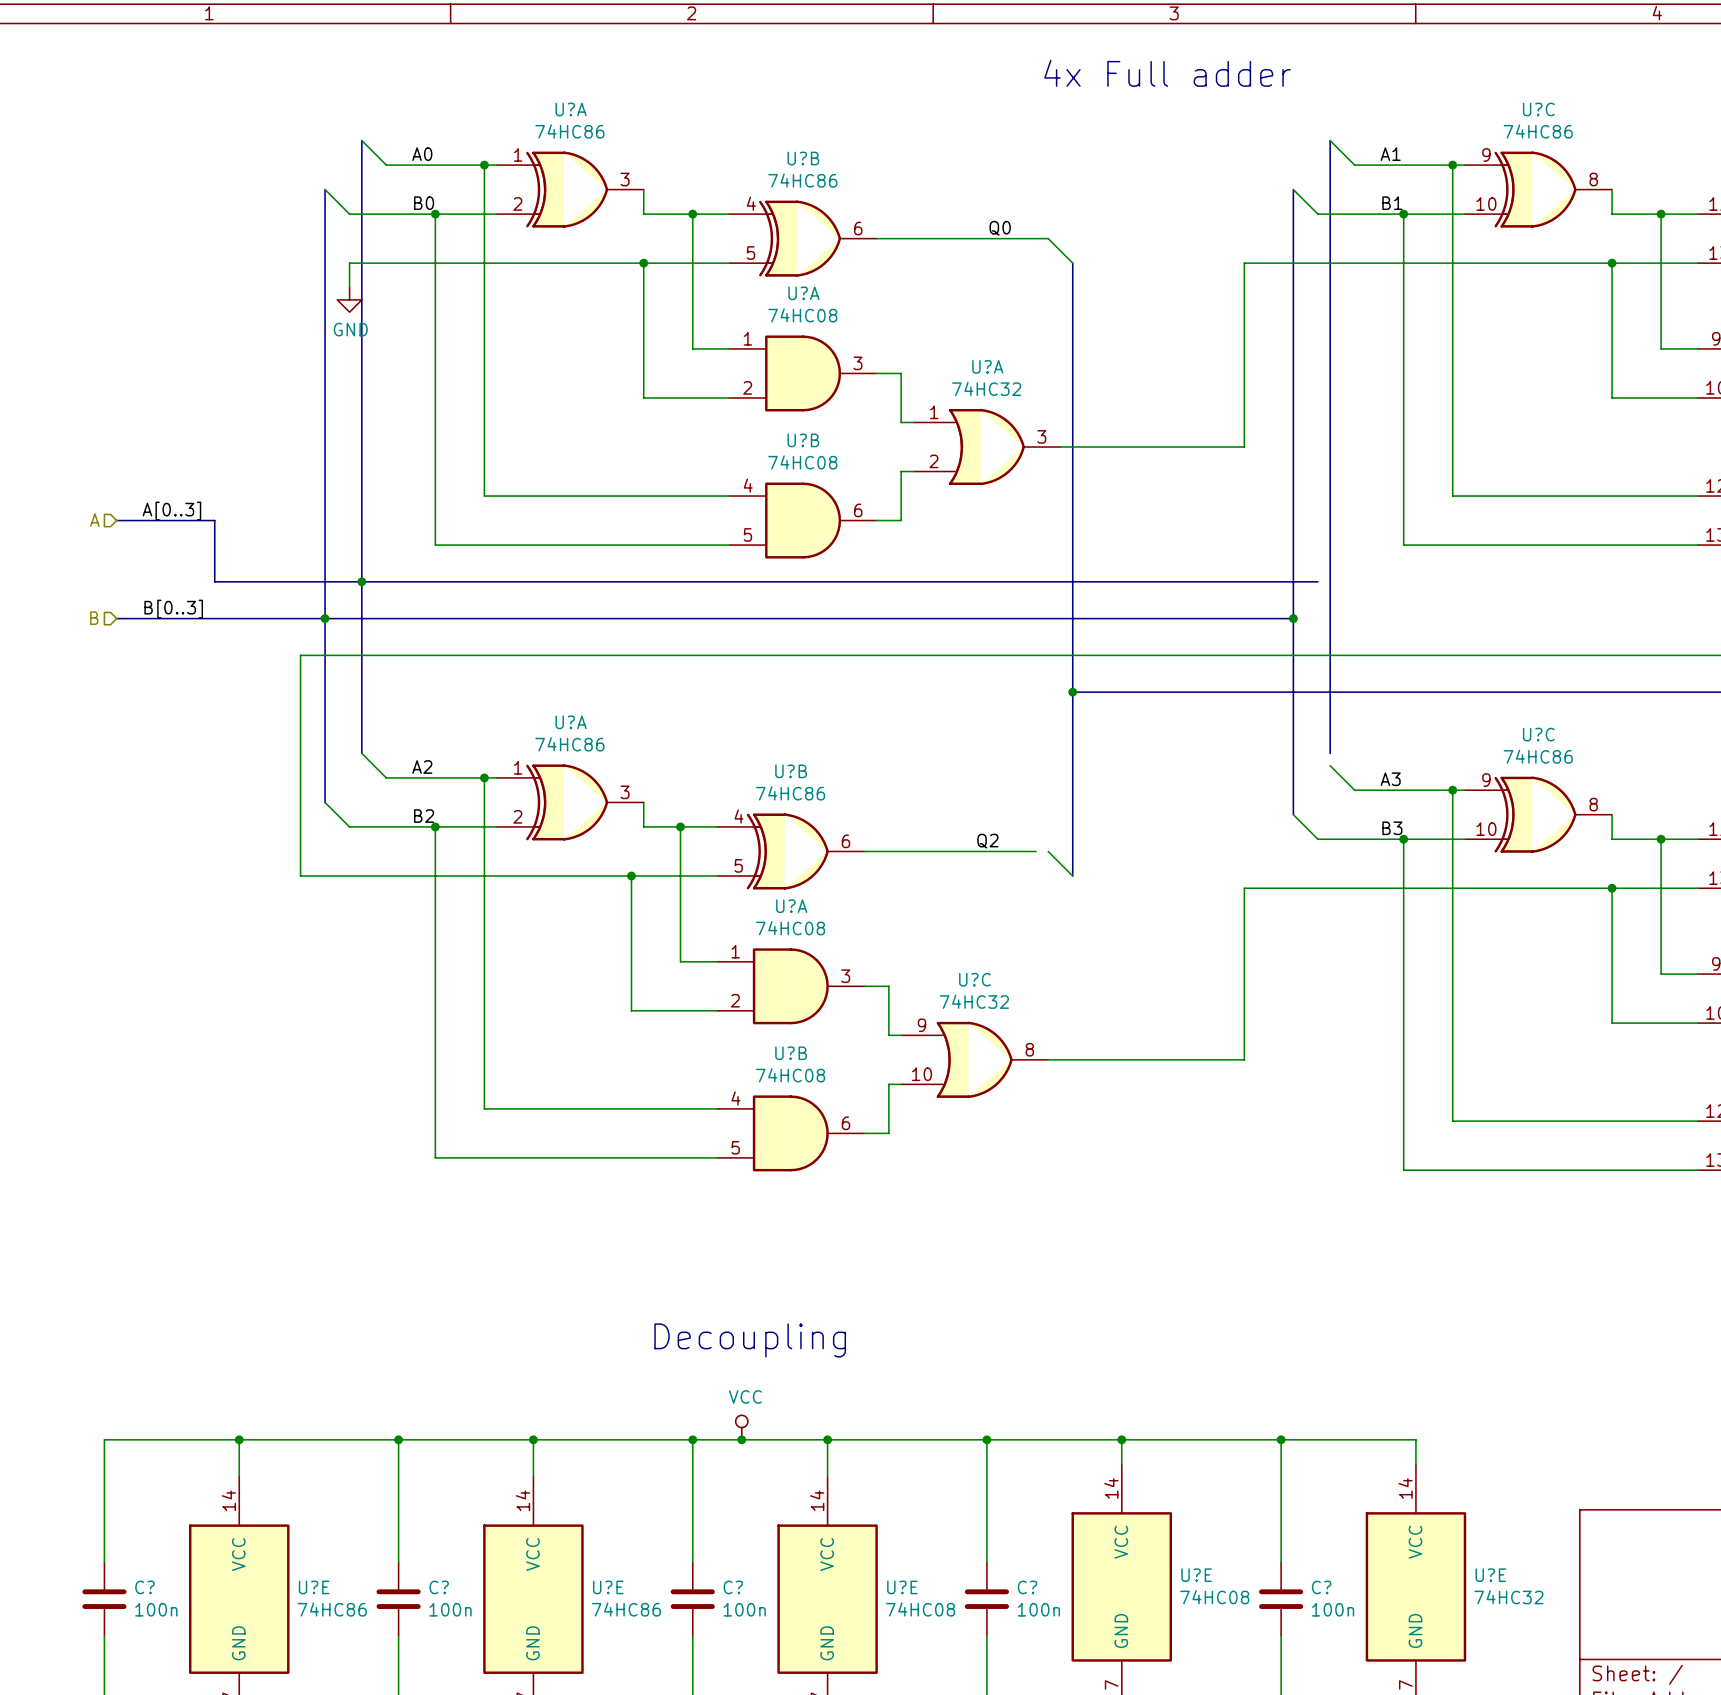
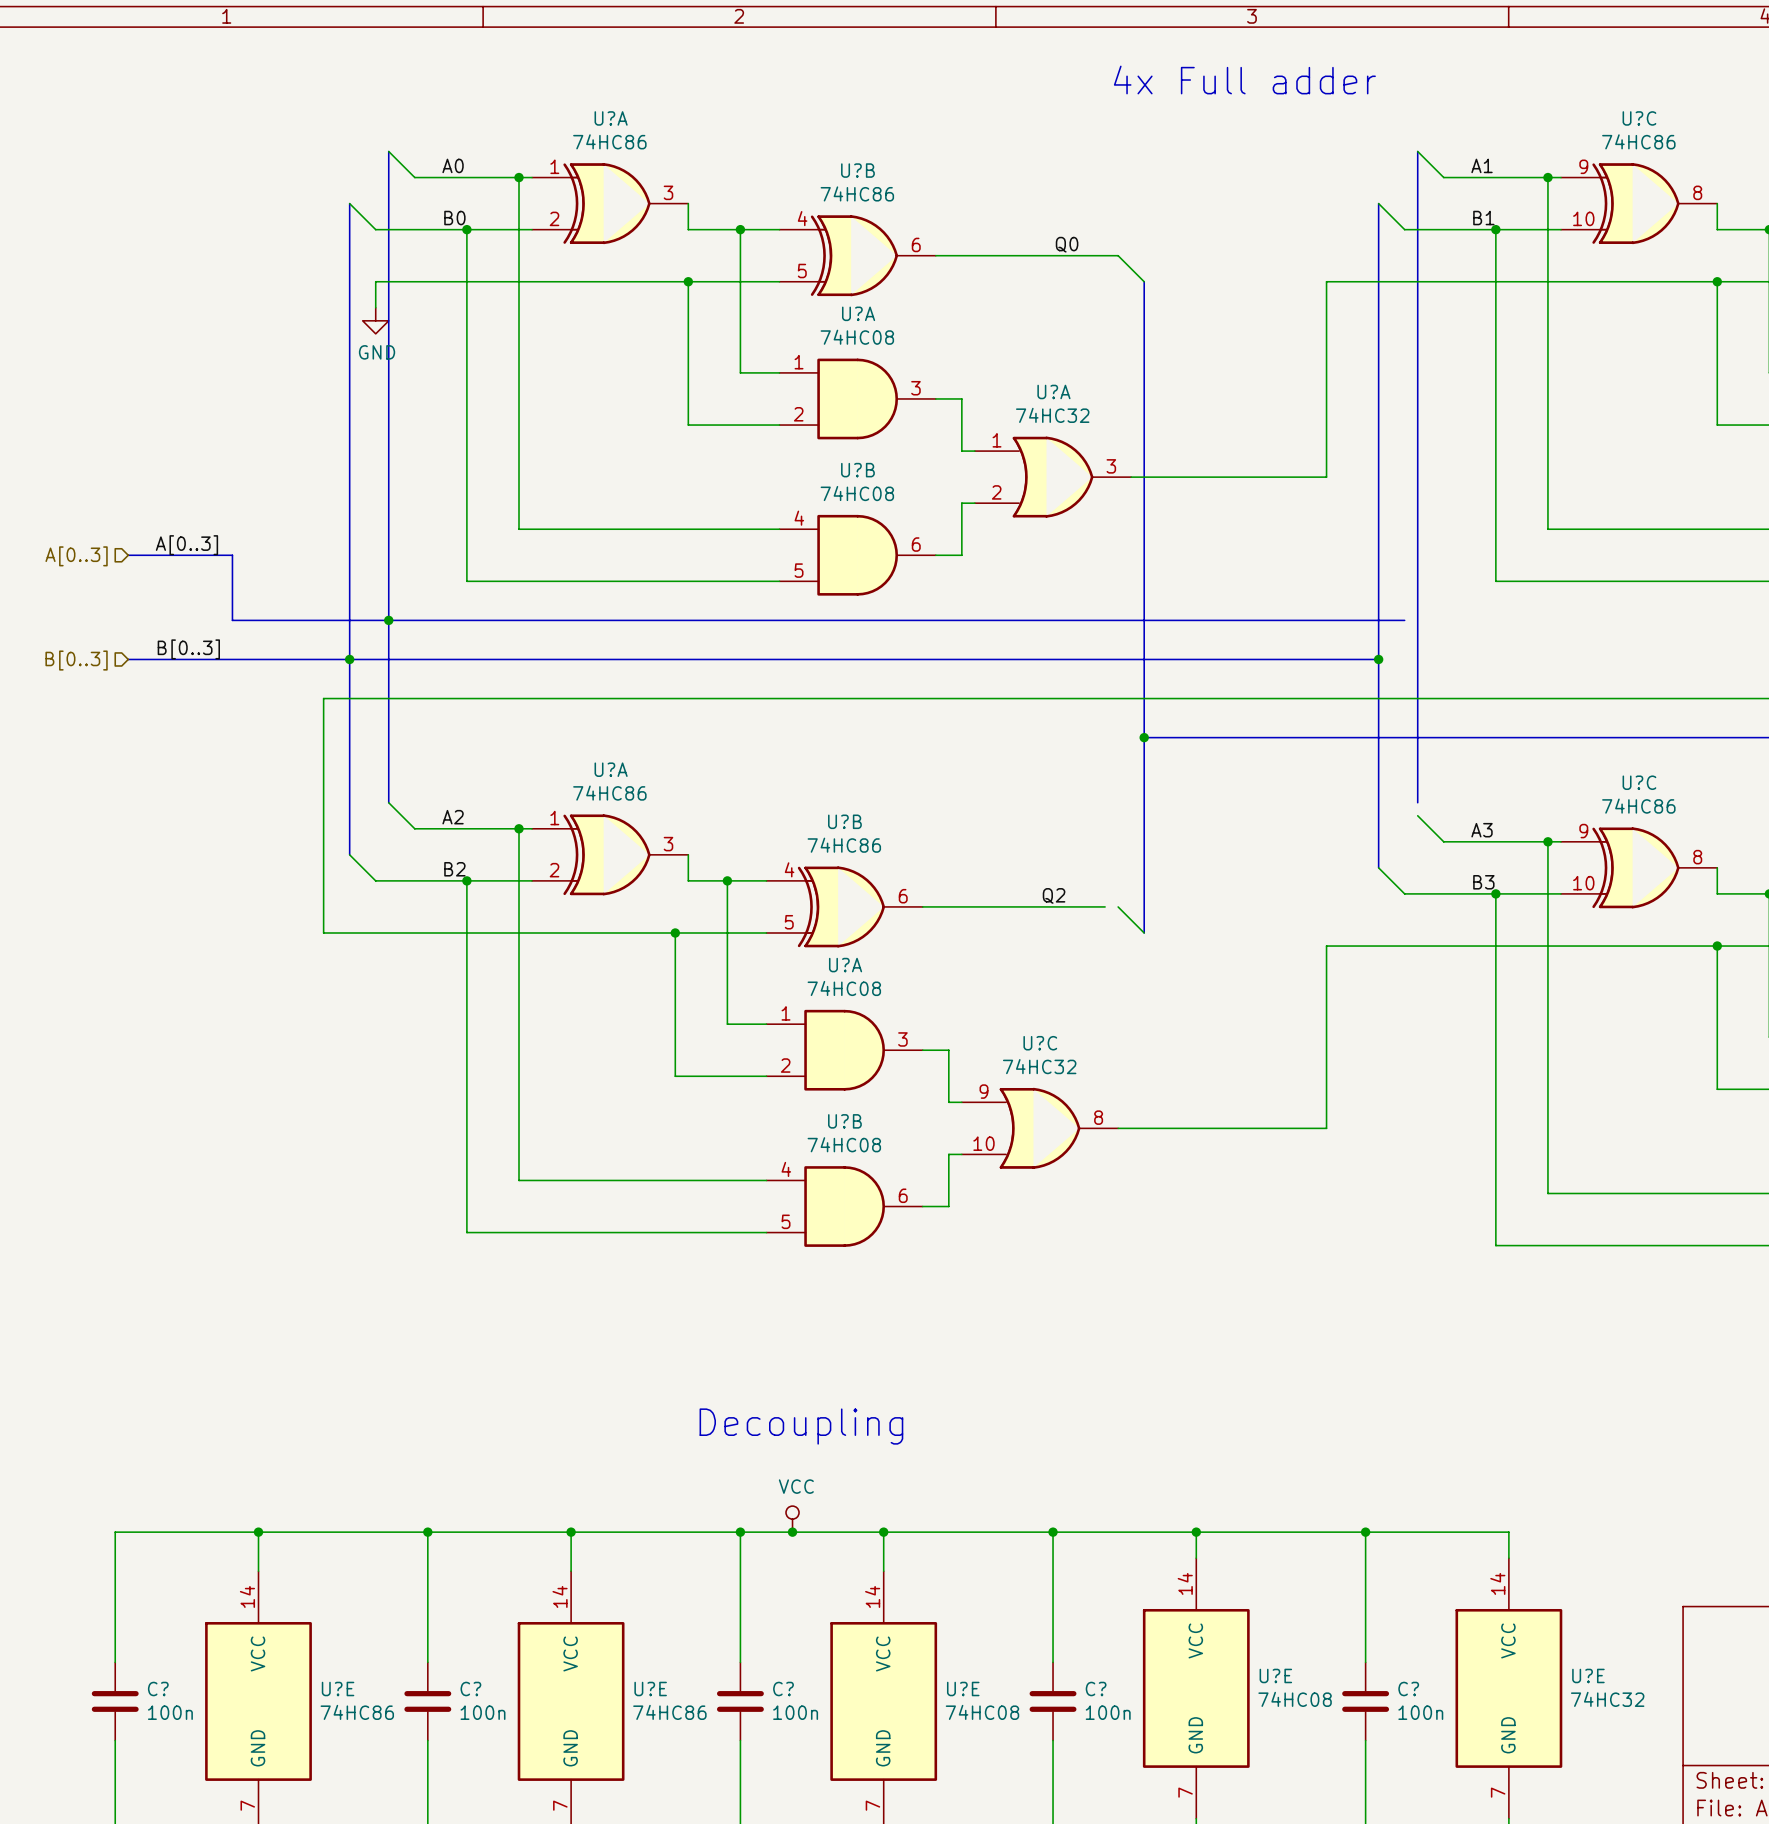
hierarchical label: A (94, 520) -> A[0..3] (76, 556)
hierarchical label: B (94, 618) -> B[0..3] (76, 660)

